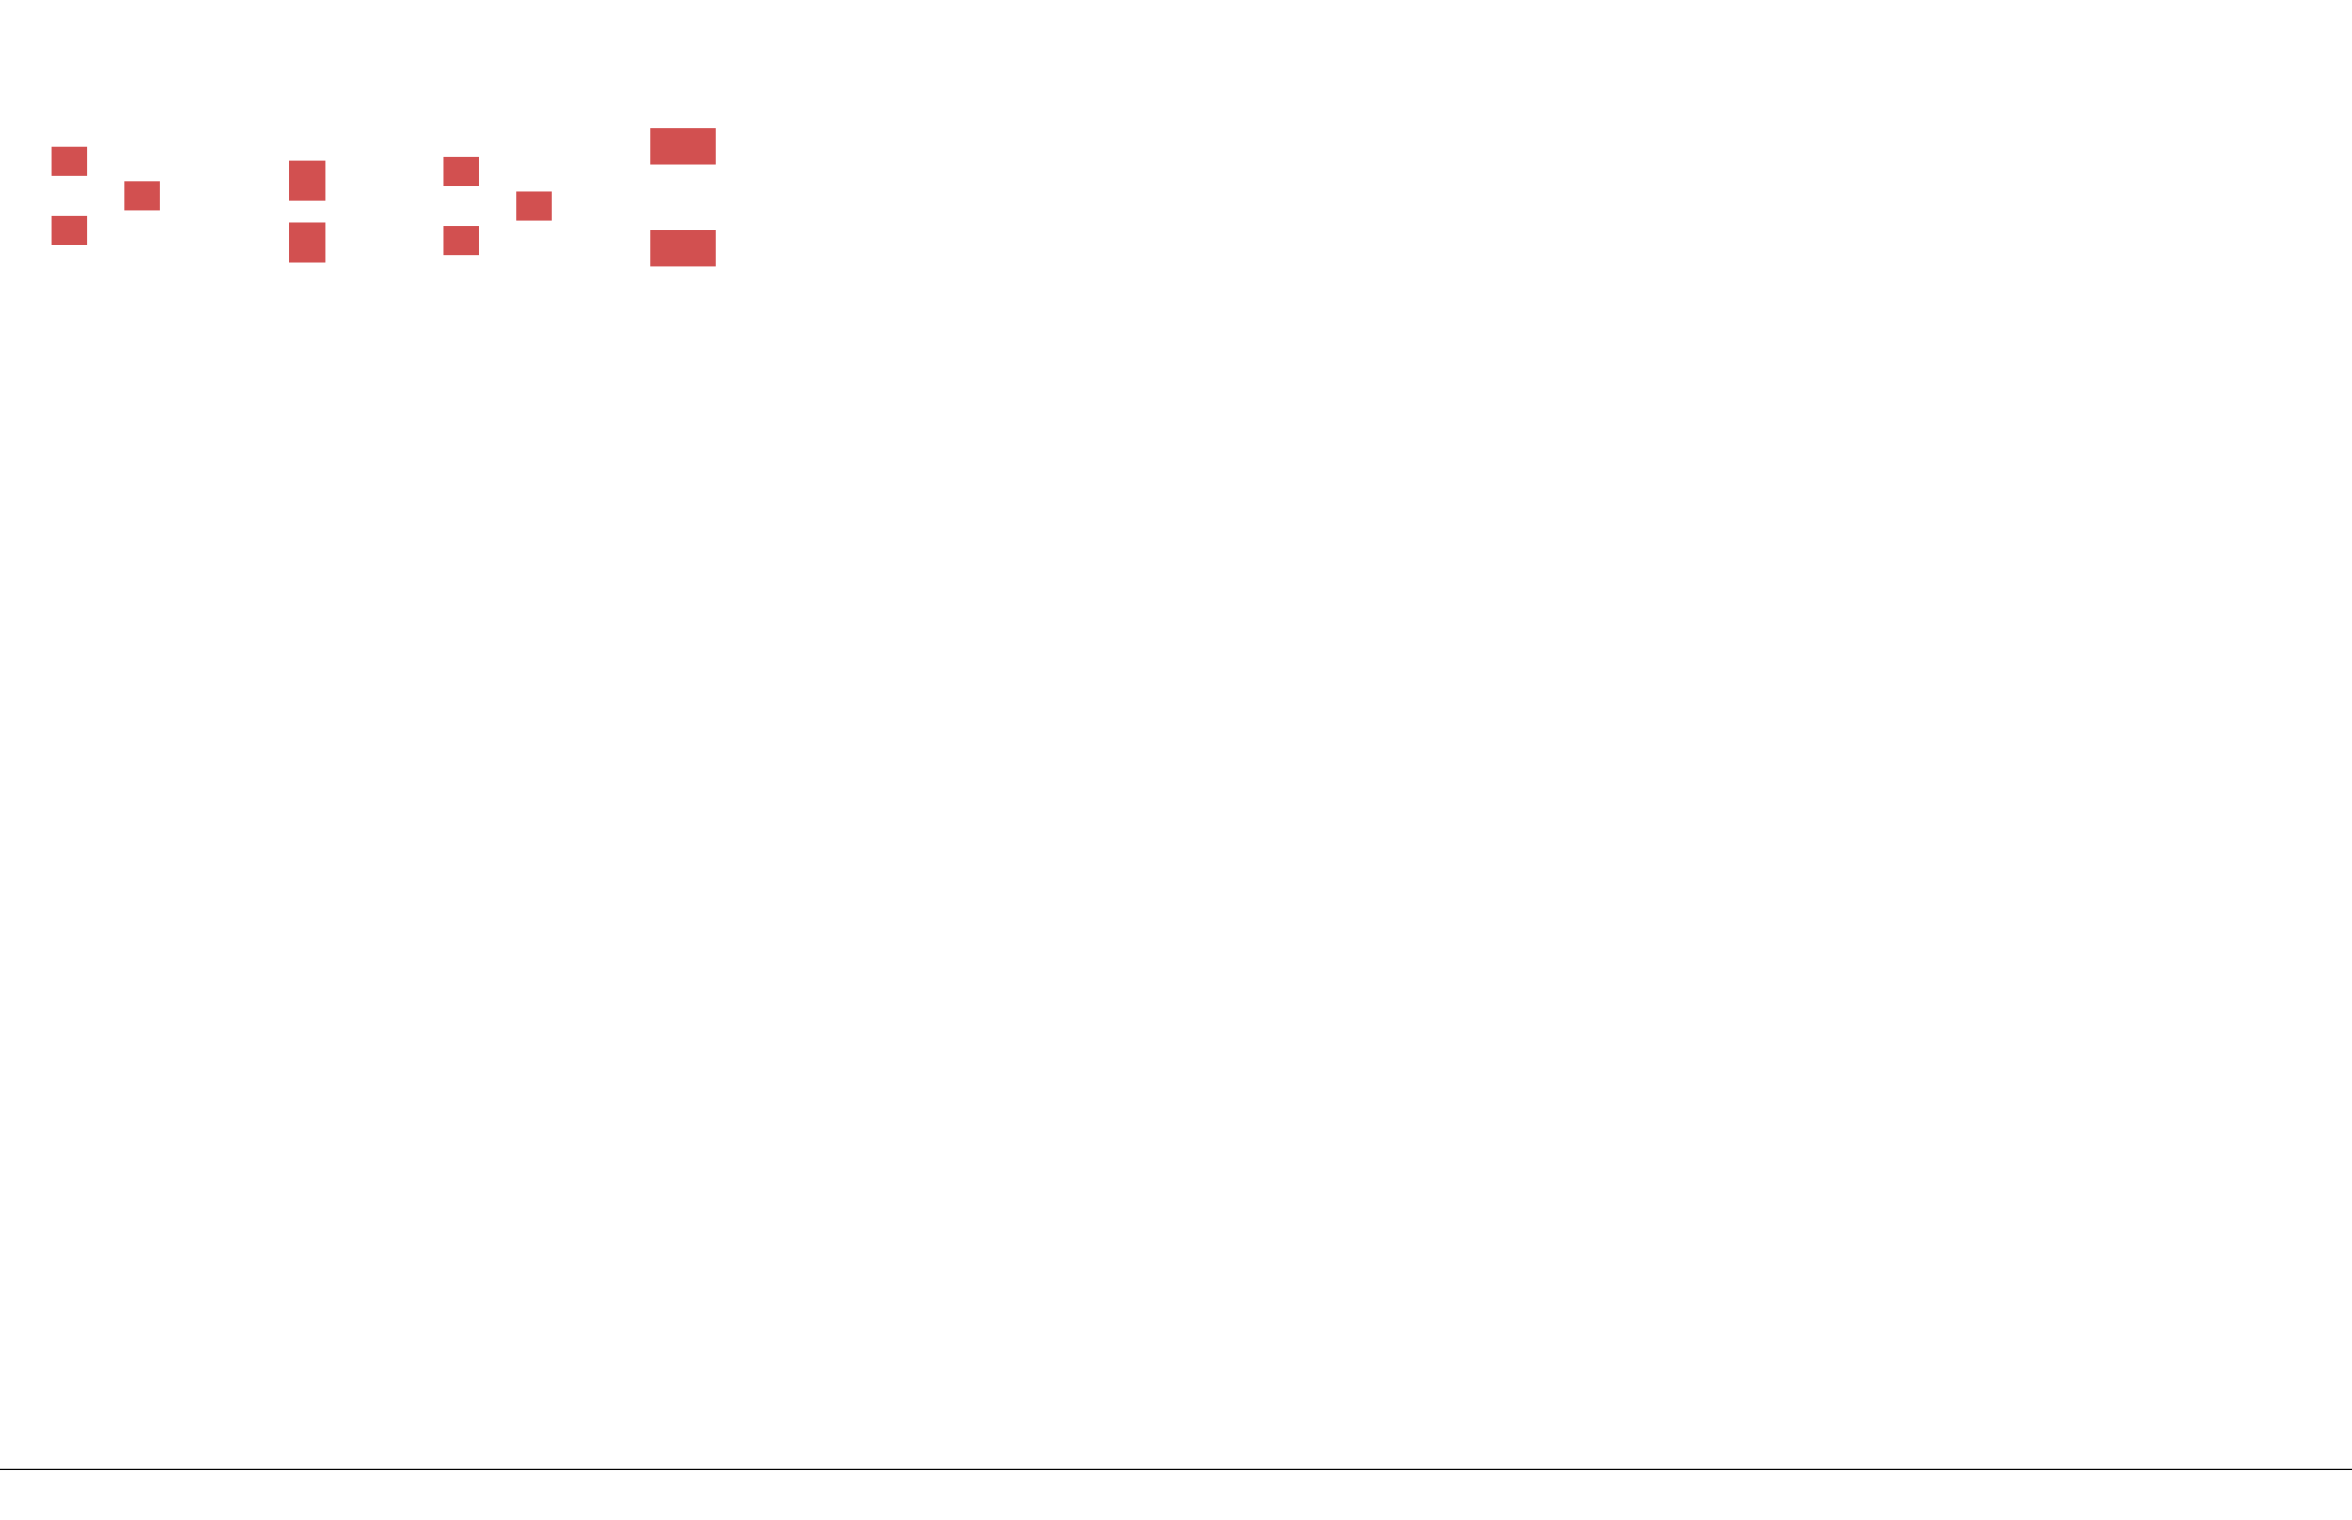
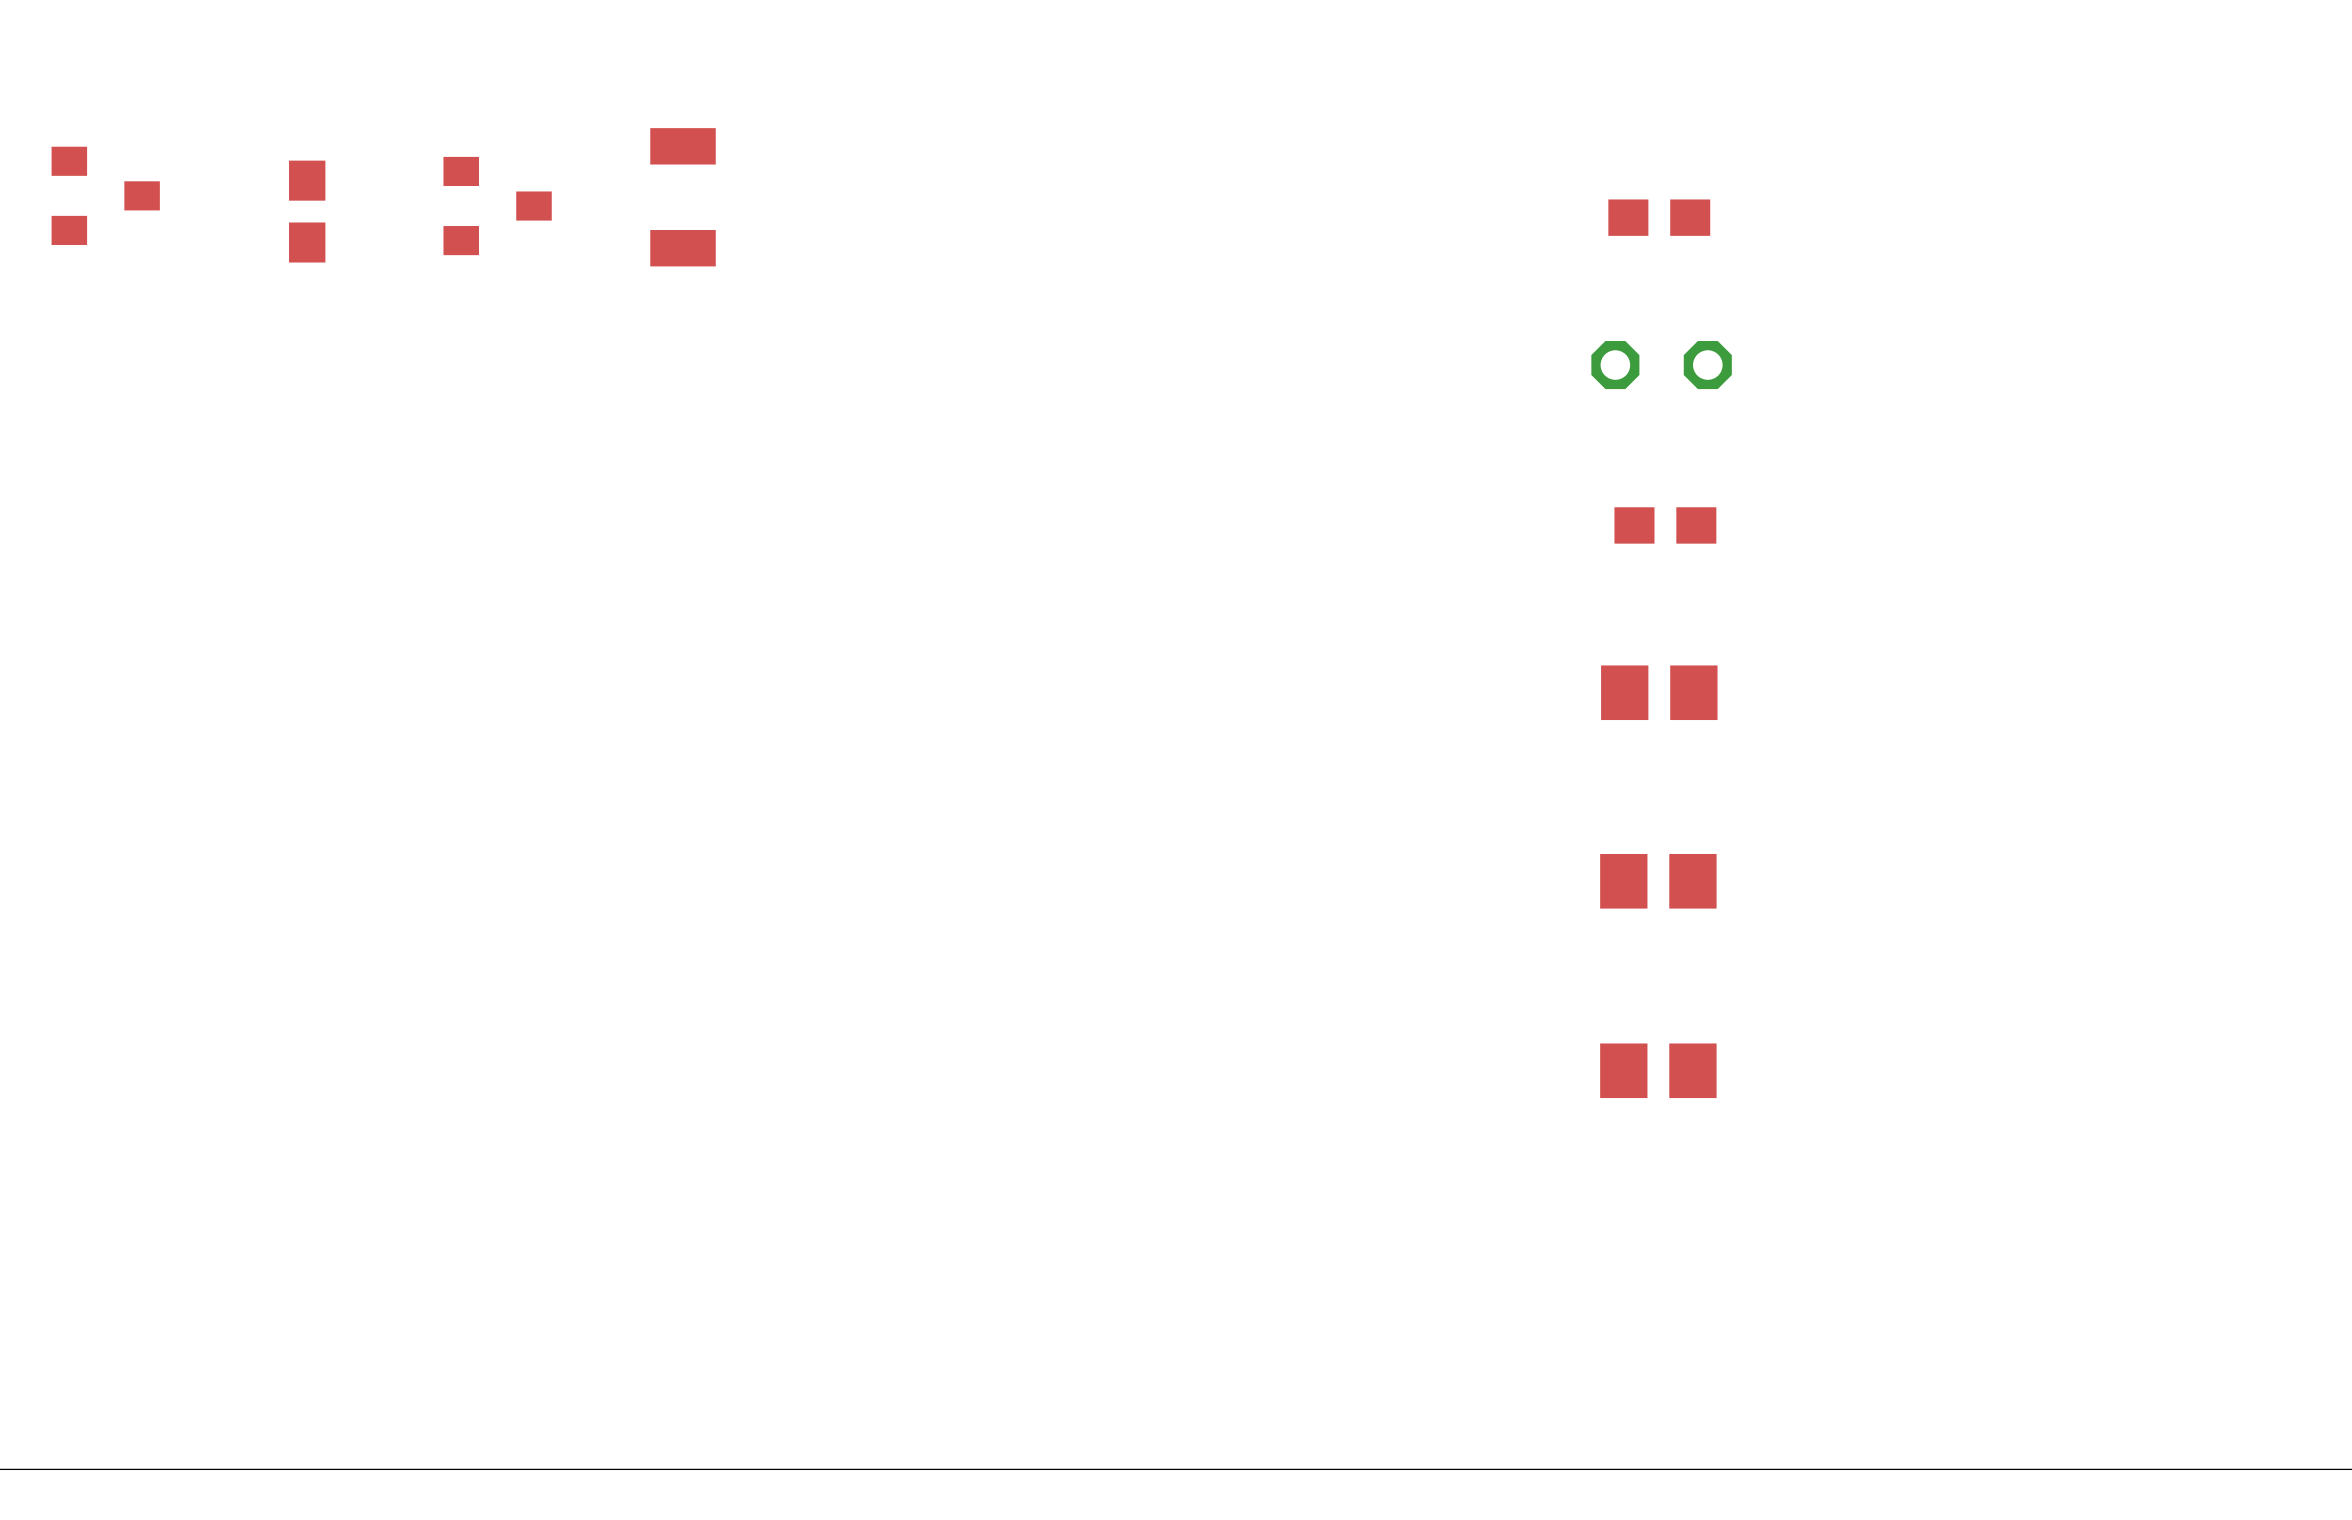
part: none -> (1659, 217)
part: none -> (1661, 365)
part: none -> (1665, 525)
part: none -> (1659, 692)
part: none -> (1658, 881)
part: none -> (1658, 1070)

